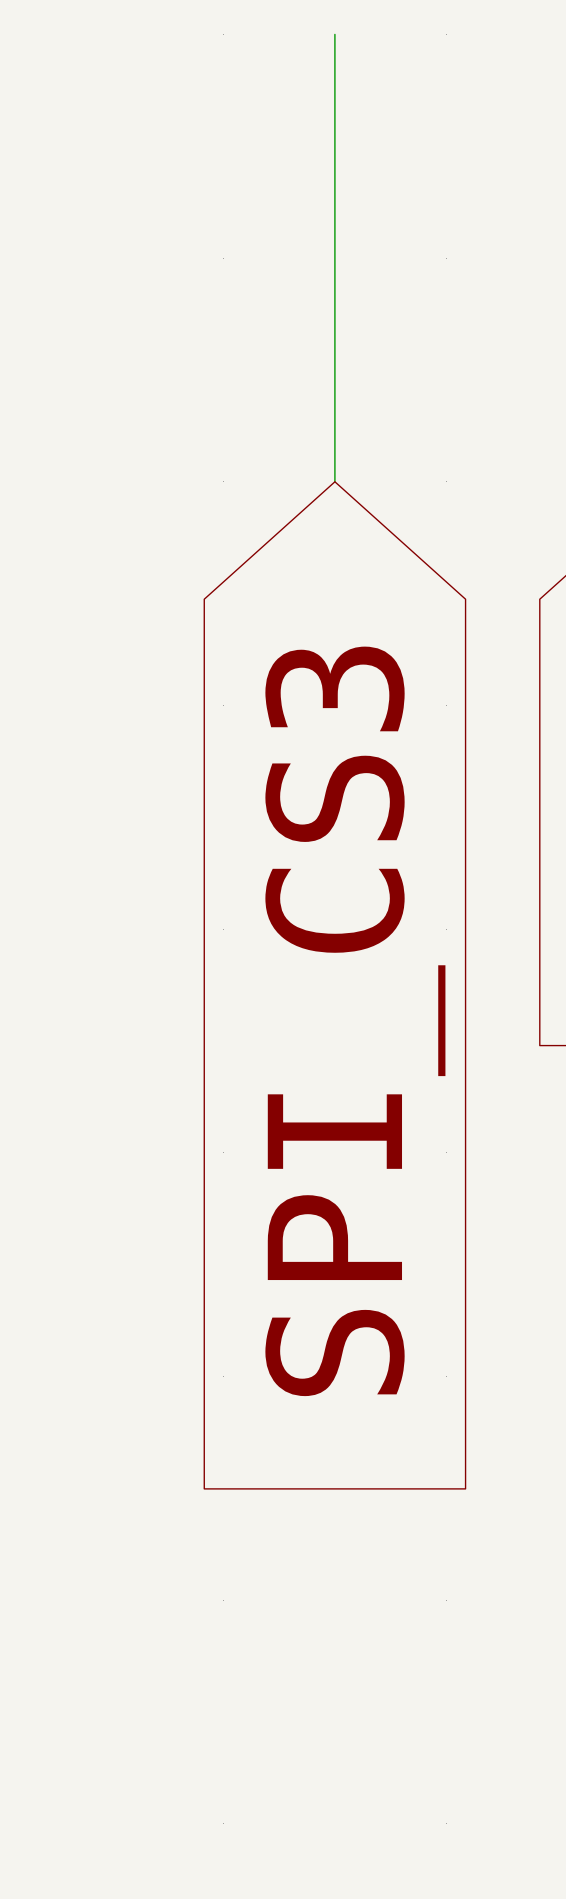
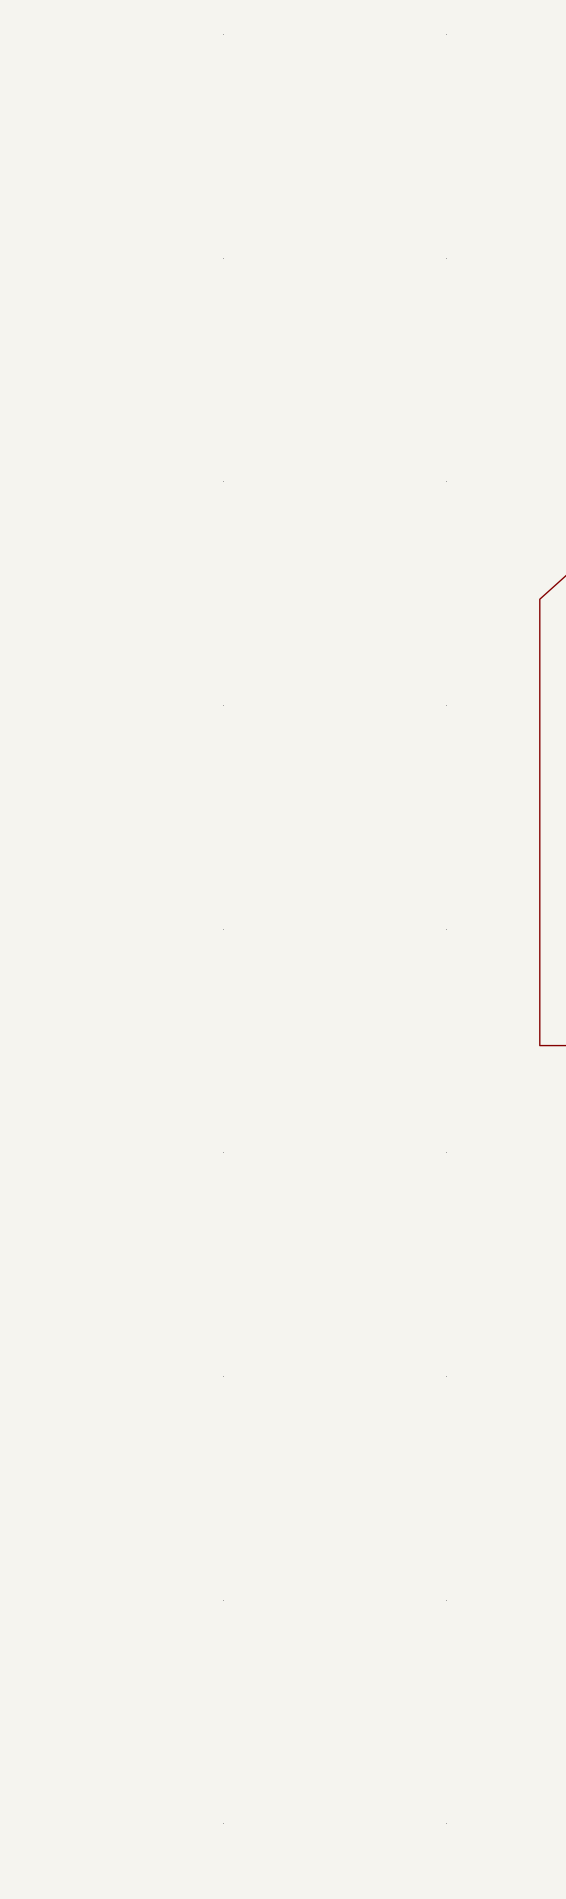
wire: (334, 34) (334, 481) -> none
global label: SPI_CS3 (355, 1021) -> none

